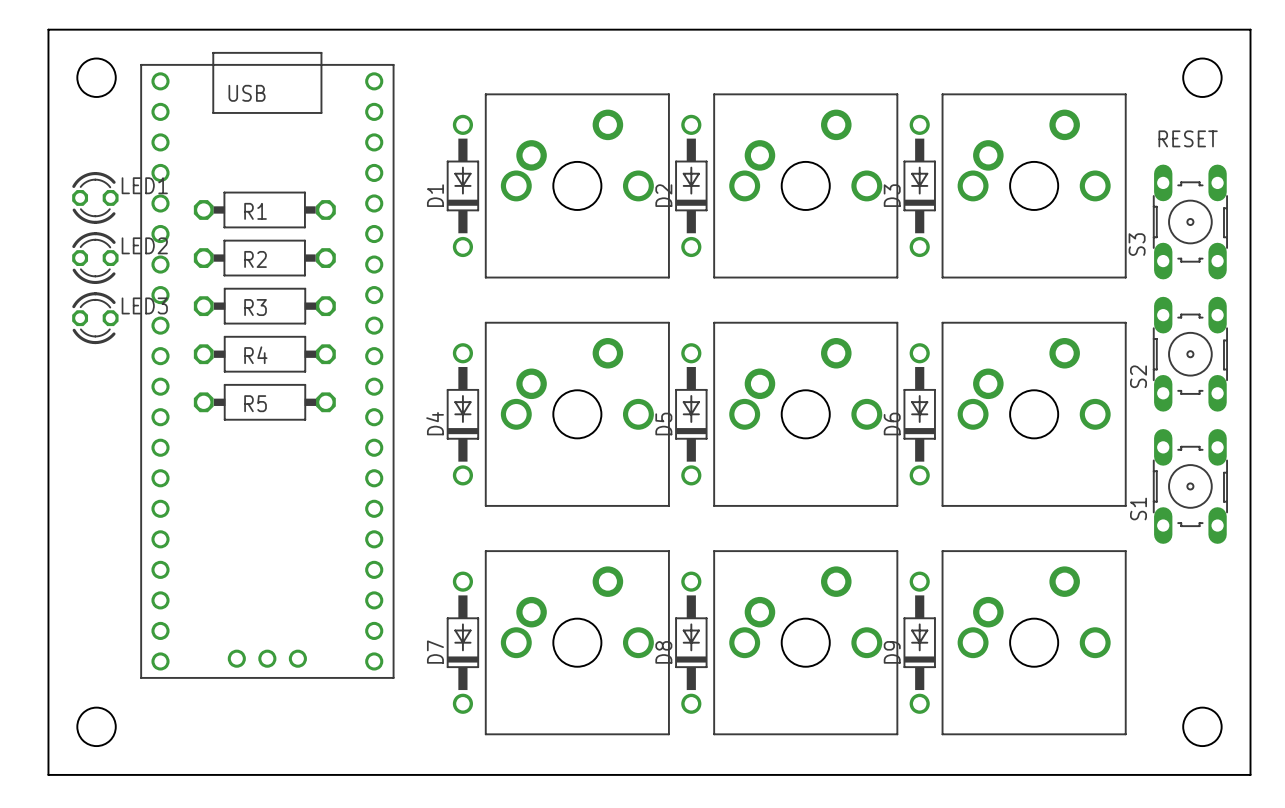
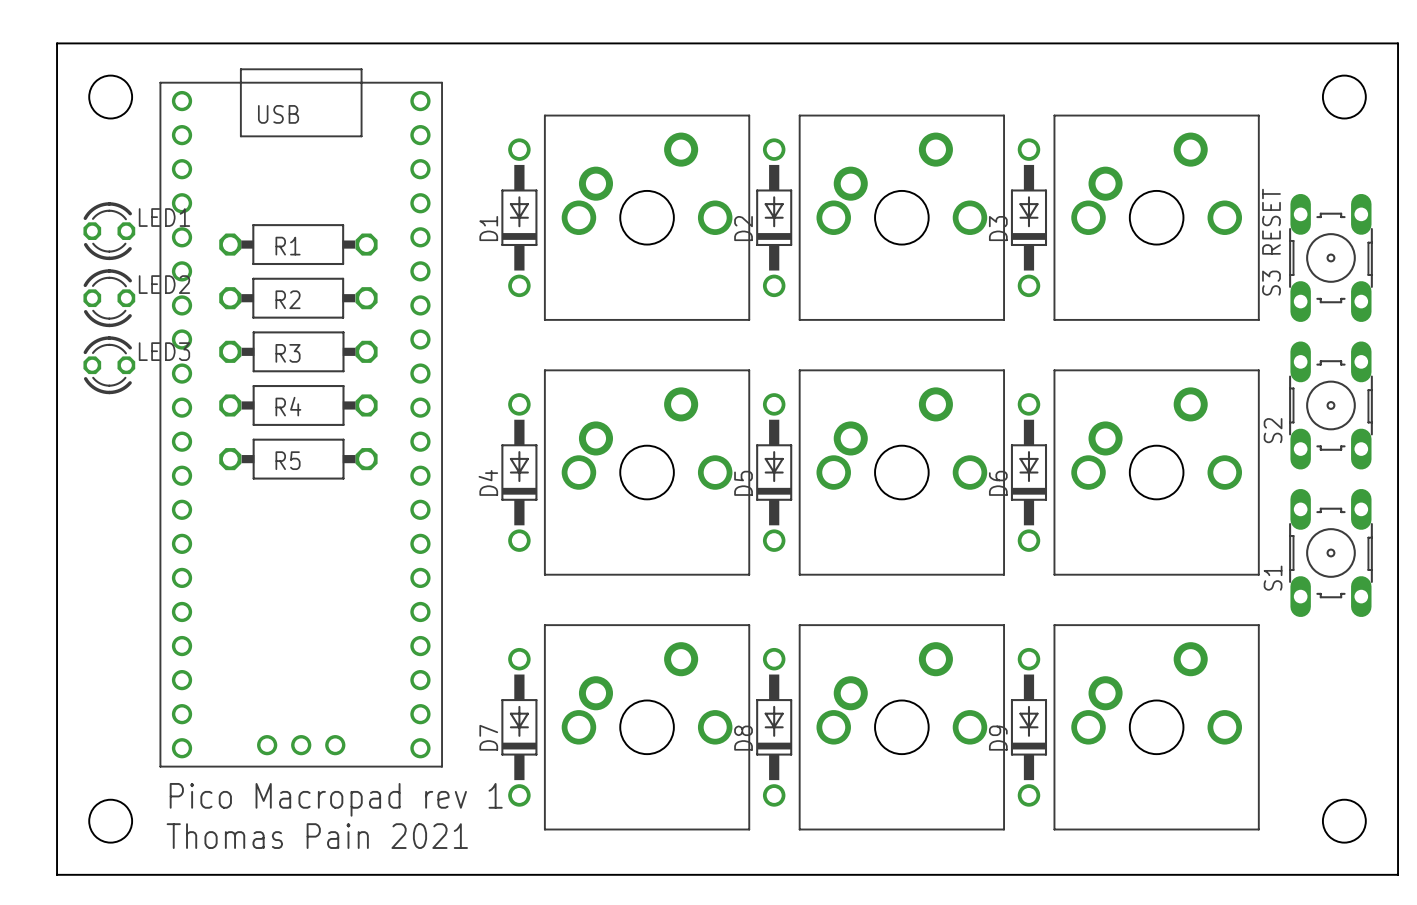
S3 value rotation: 0° (1188, 138) -> 90° counterclockwise (1271, 221)
text: none -> Pico Macropad rev 1 (336, 799)
text: none -> Thomas Pain 2021 (317, 836)

